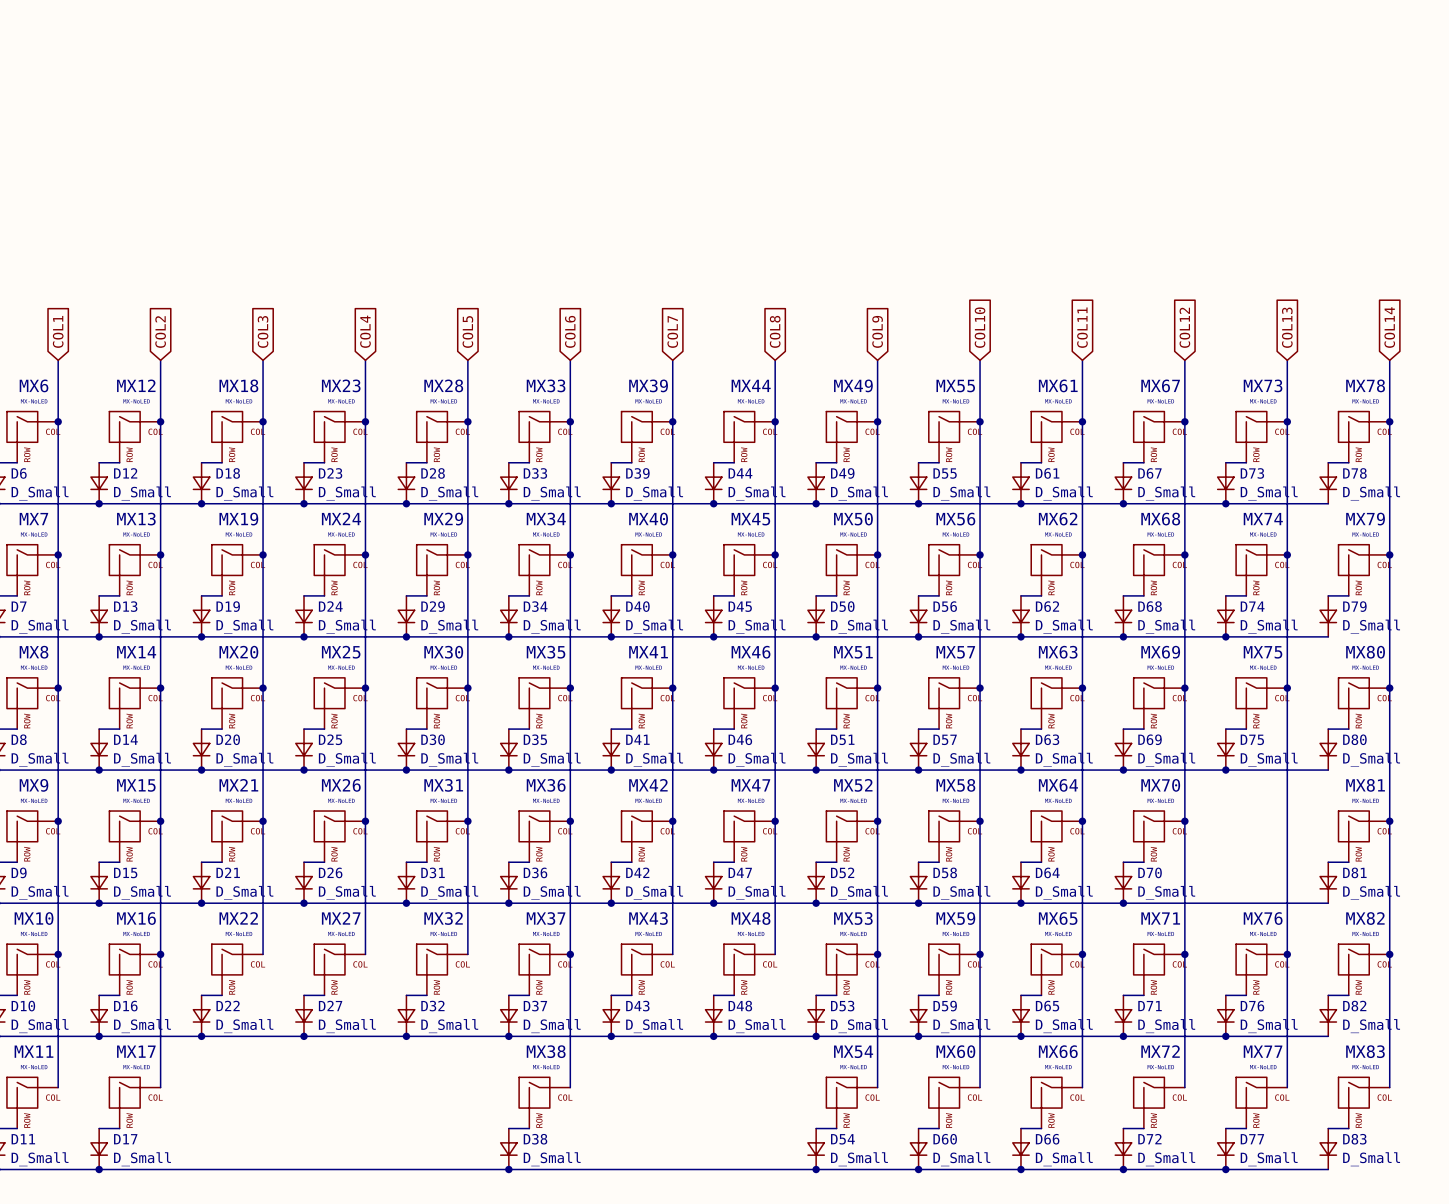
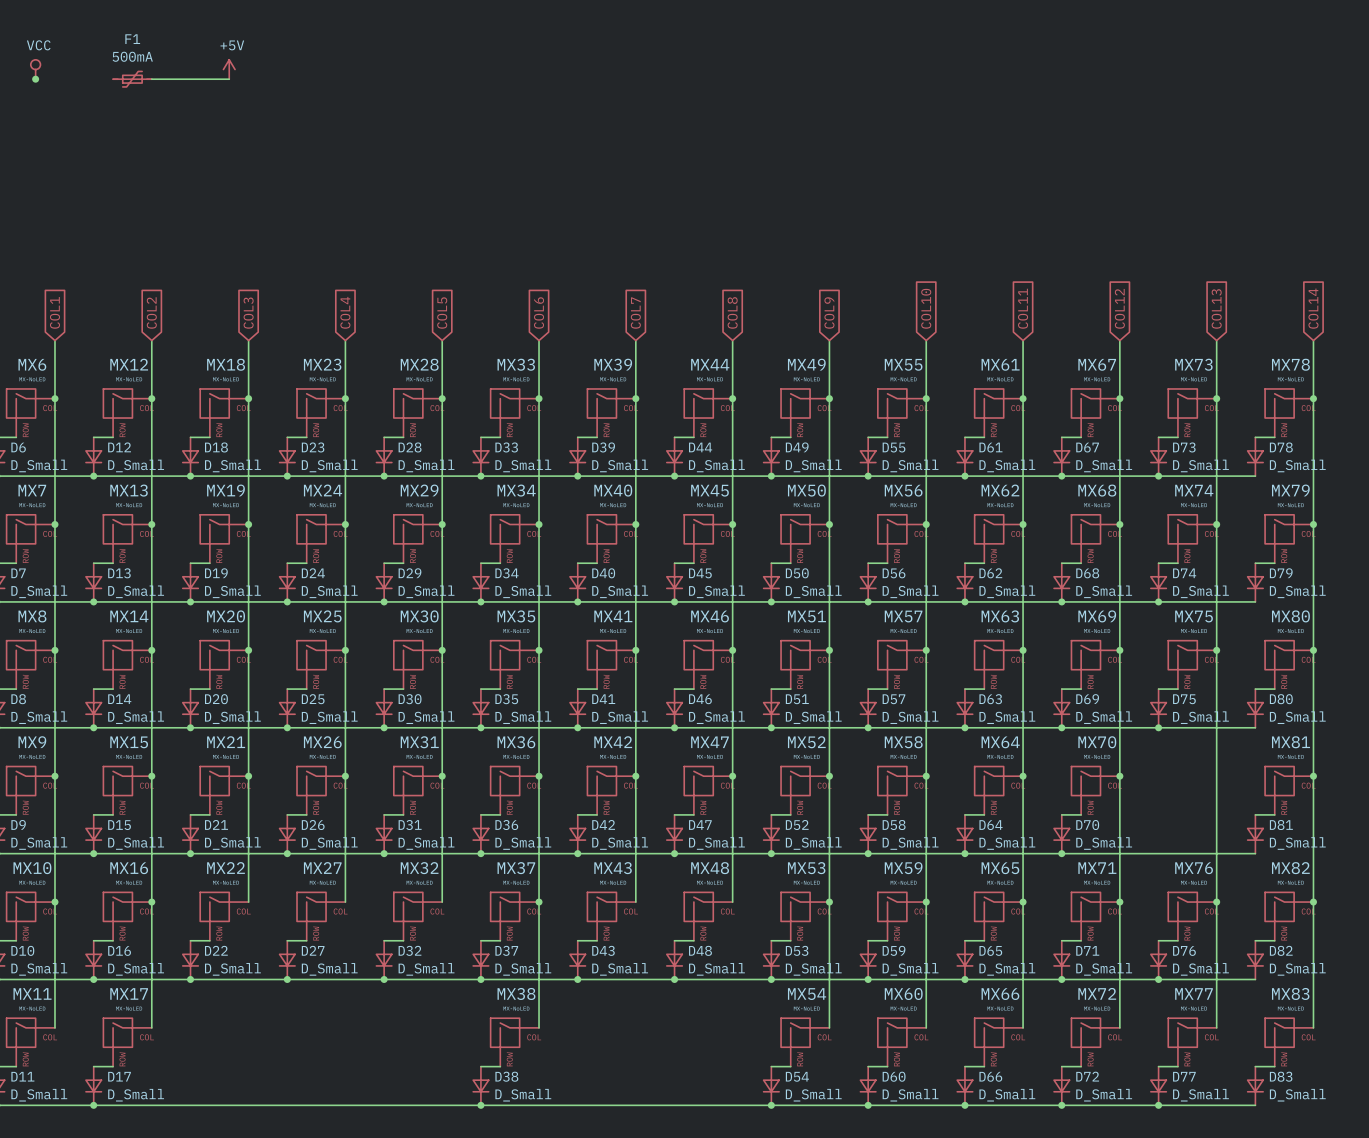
power symbol: none -> VCC (35, 69)
power symbol: none -> +5V (229, 69)
junction: none -> (35, 79)
F1: none -> 500mA (132, 79)
wire: none -> (151, 79) (229, 79)

